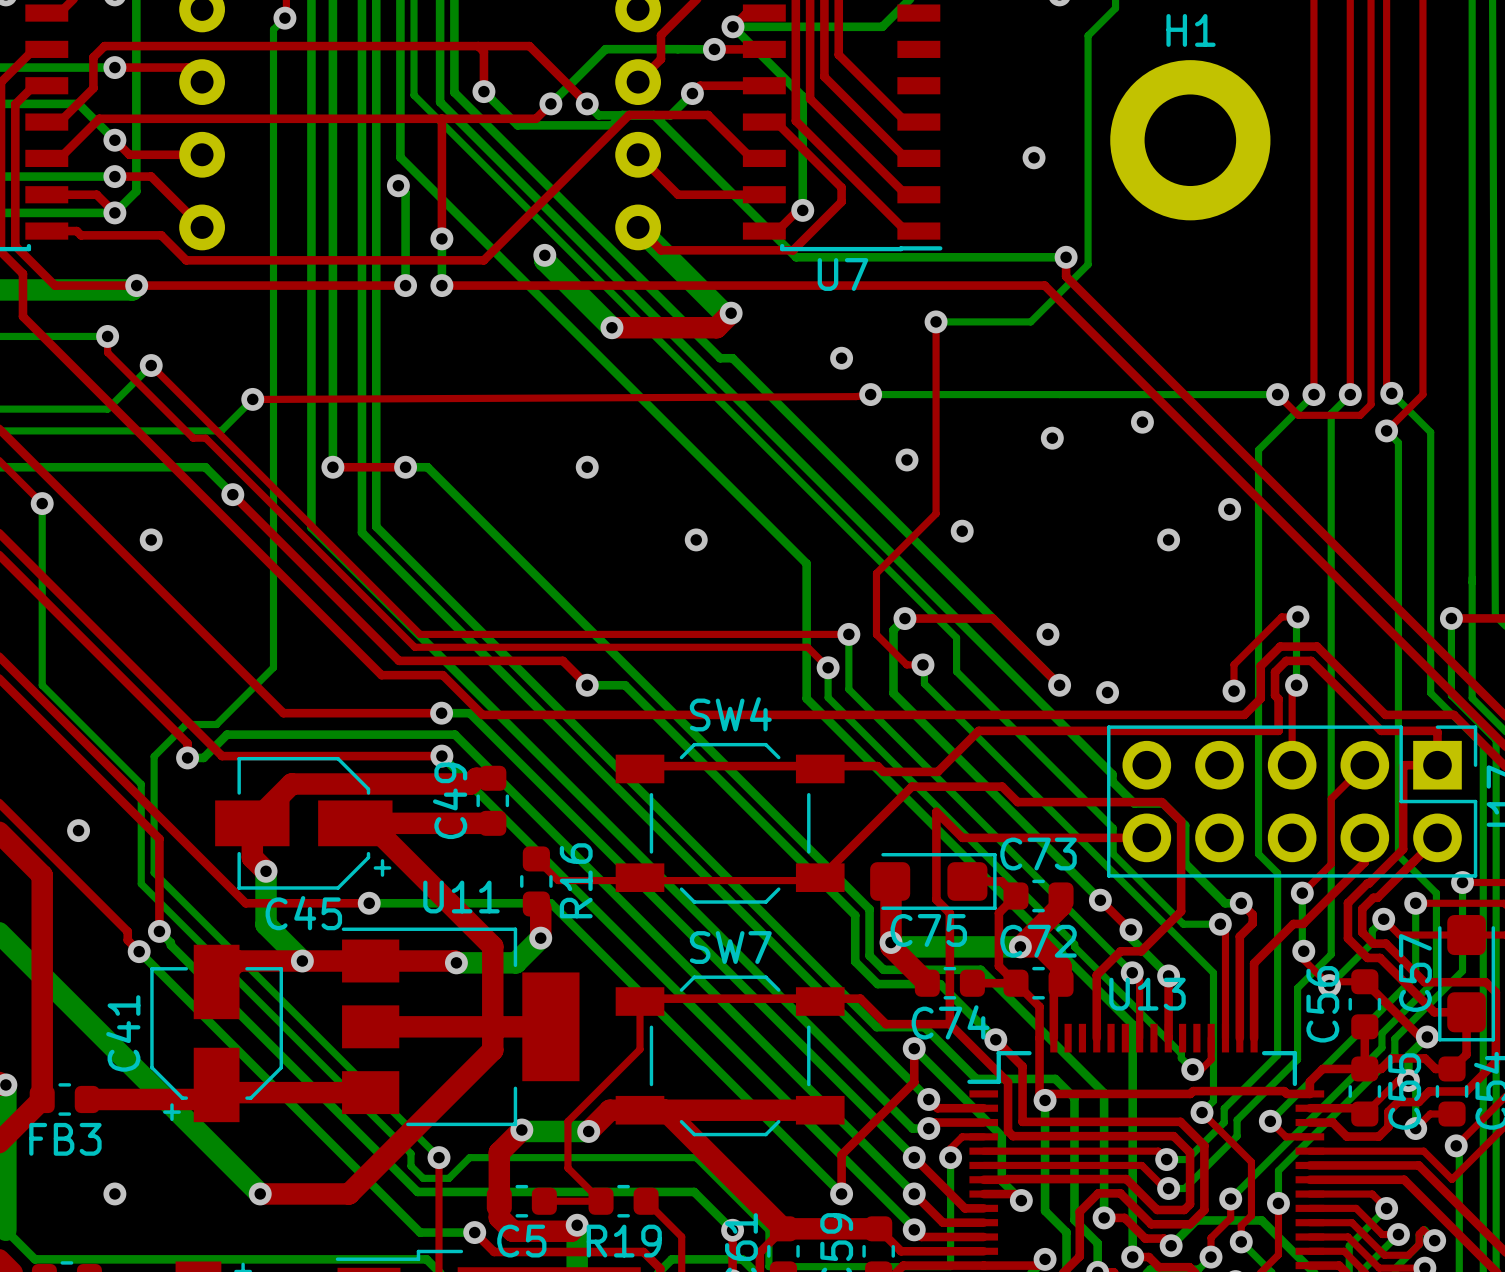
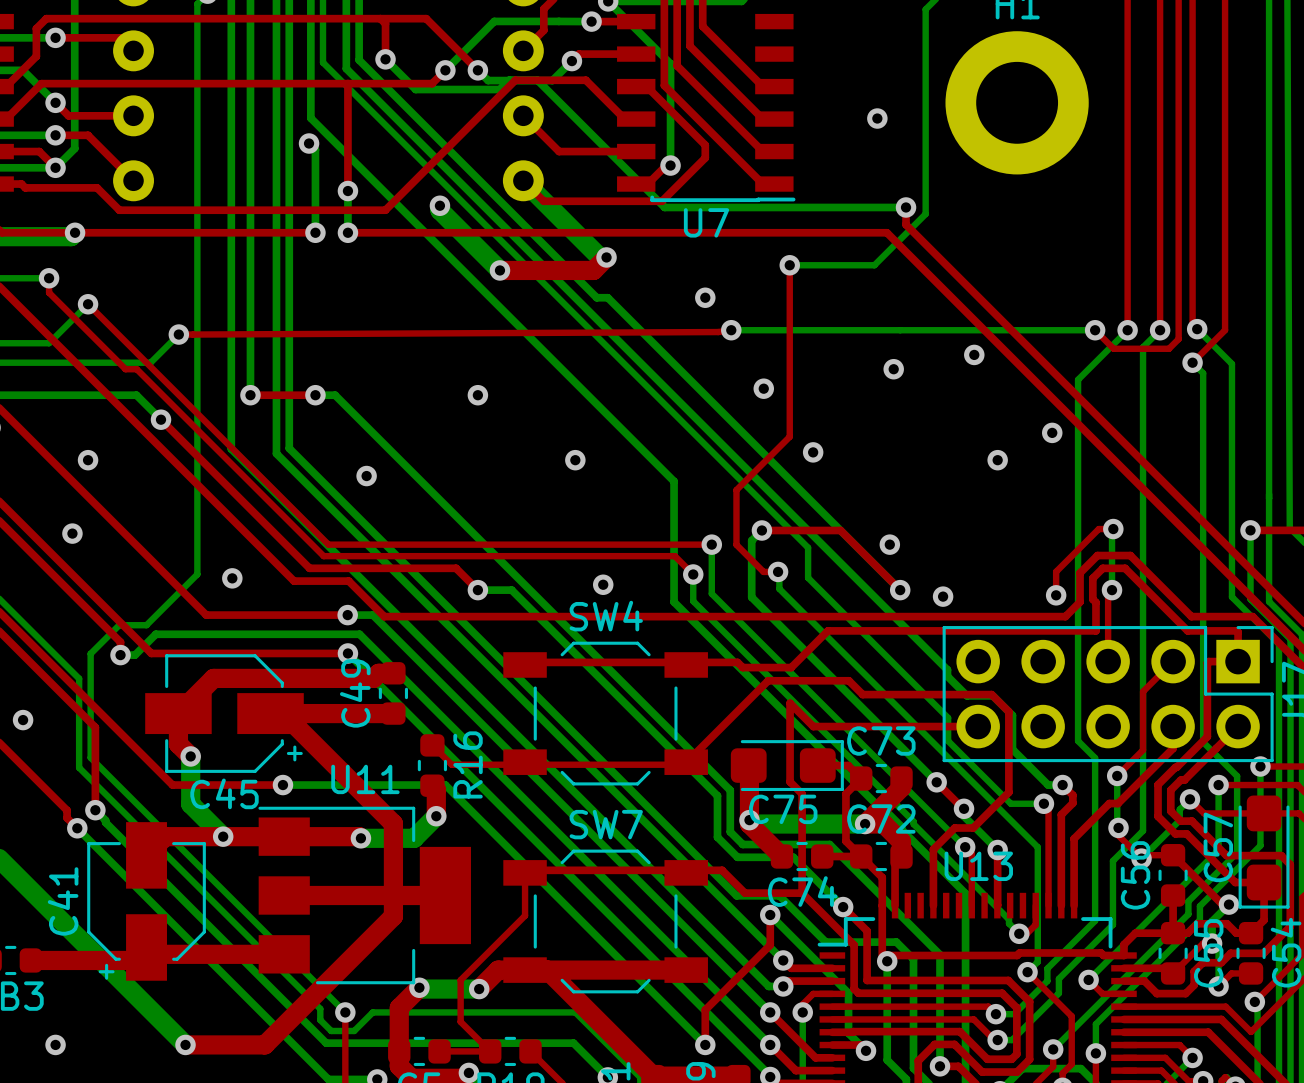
via: none -> (366, 476)
via: none -> (72, 533)
via: none -> (232, 578)
via: none -> (603, 584)

